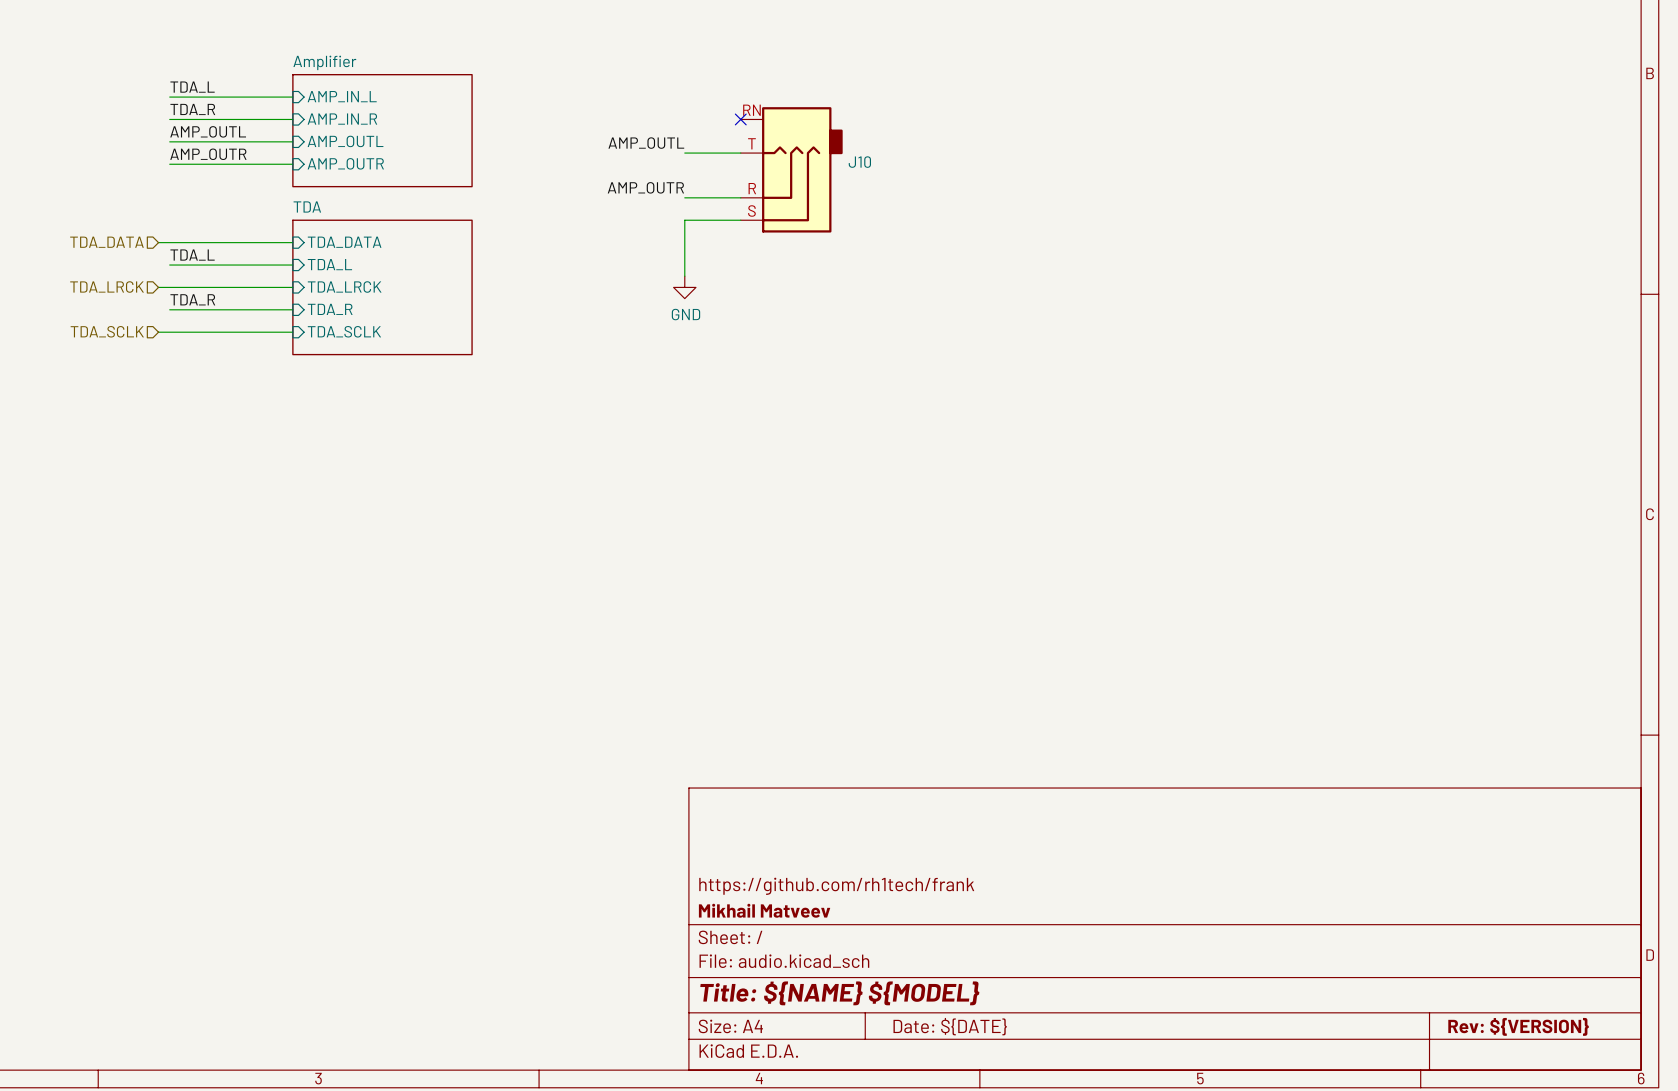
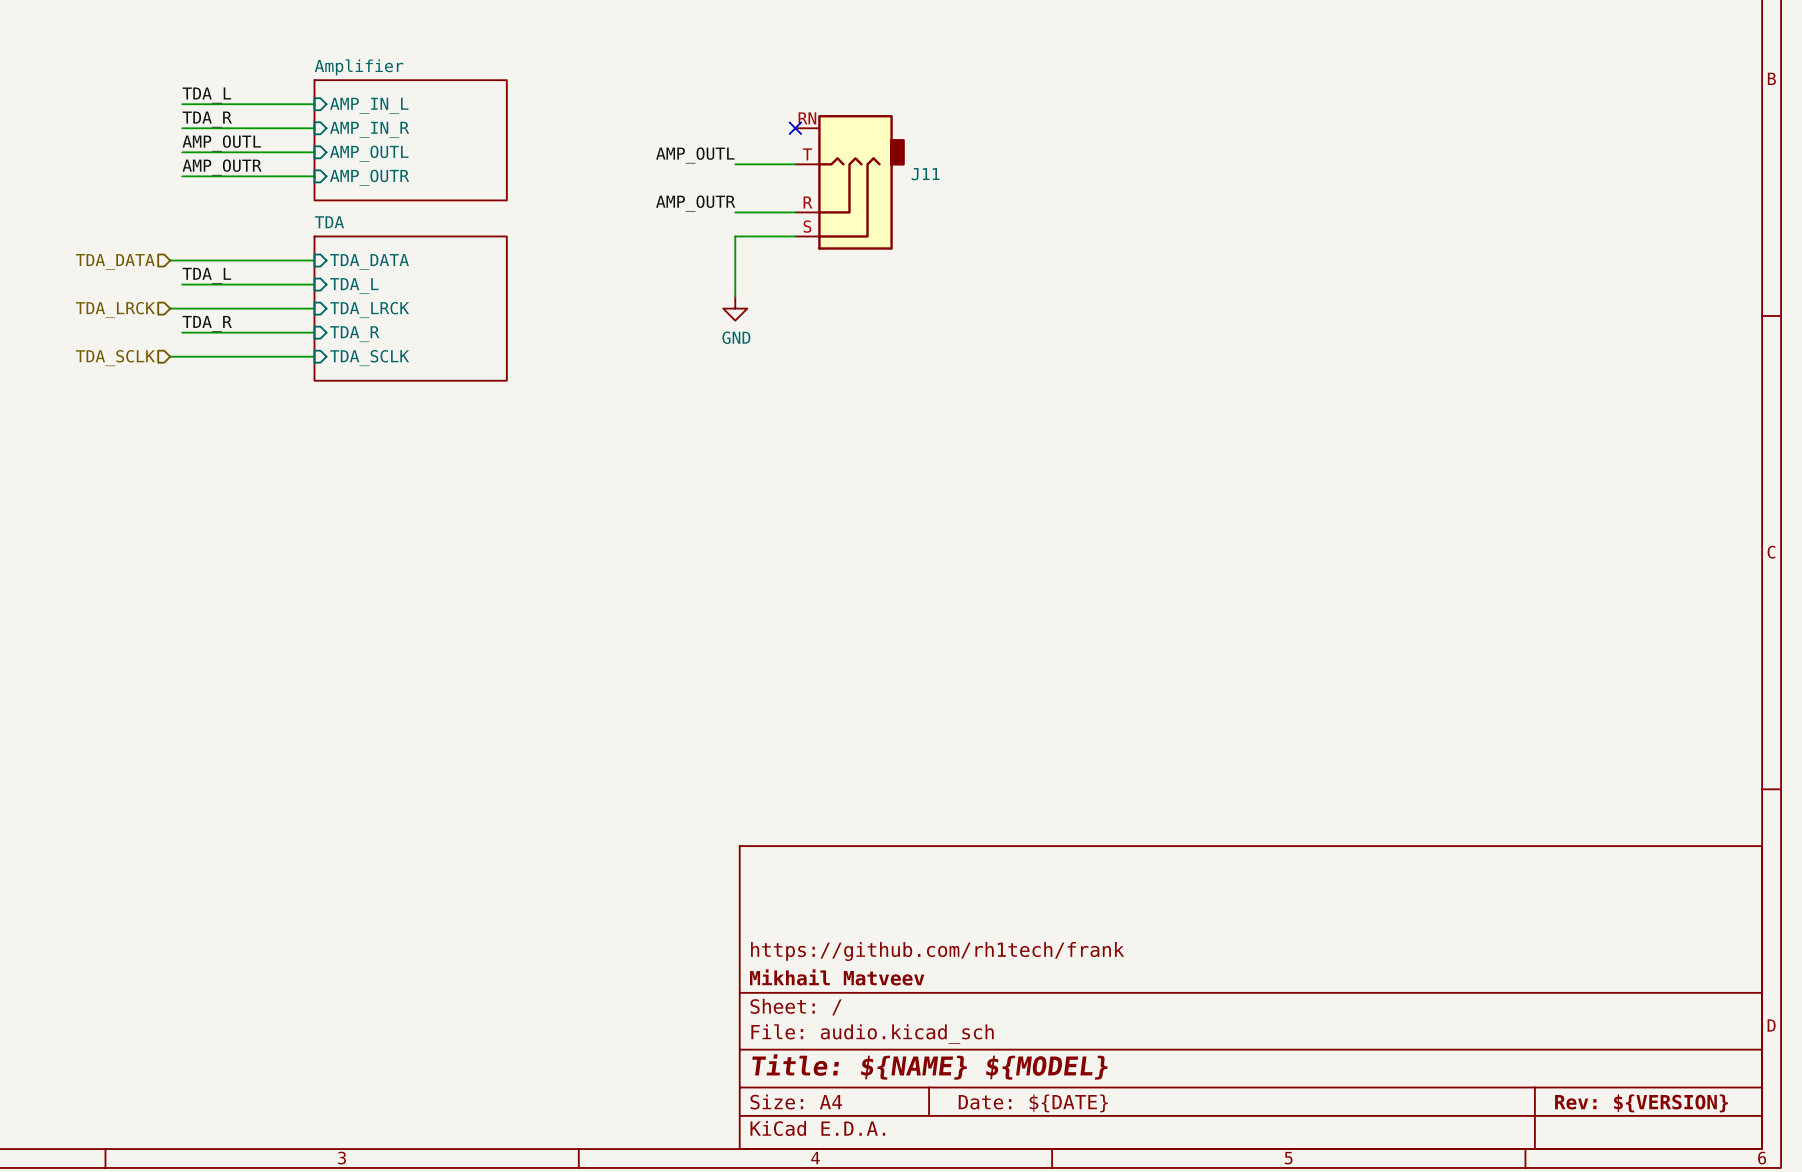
J10 name: J10 (859, 162) -> J11 (925, 174)

